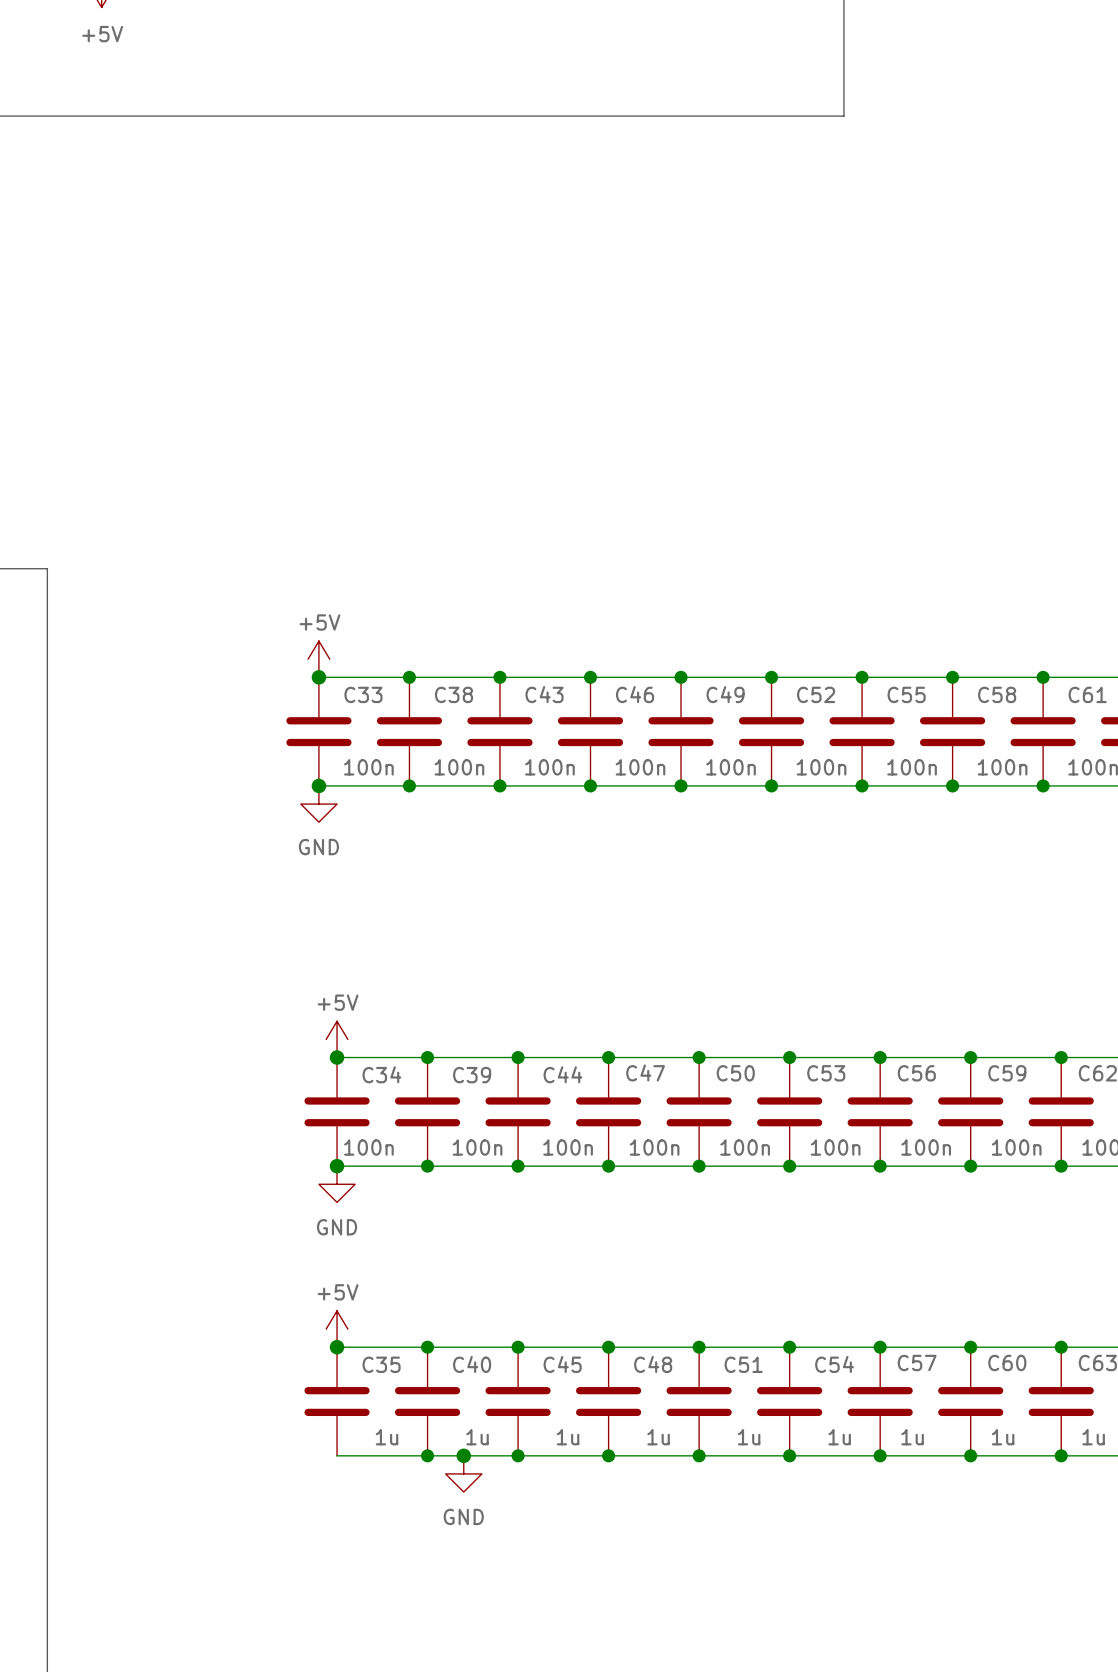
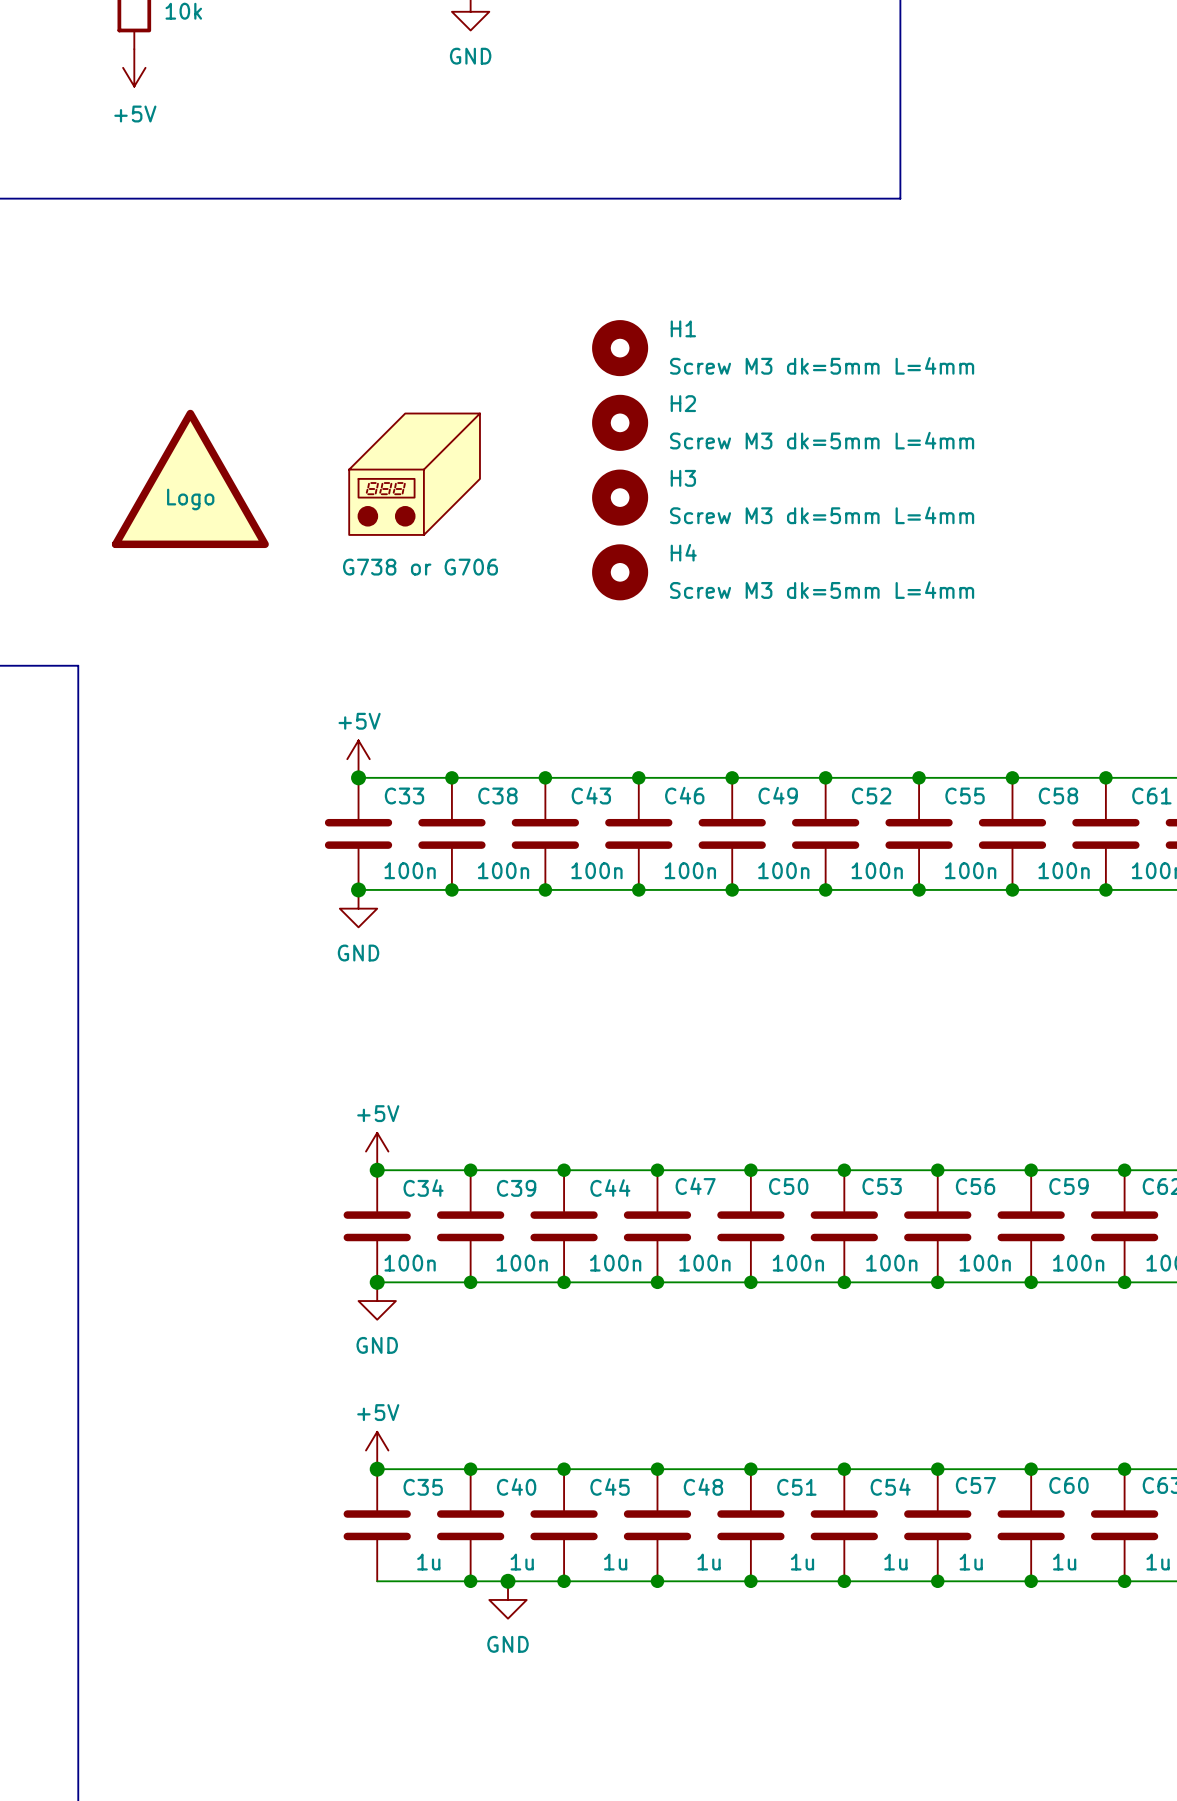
H1: none -> Screw M3 dk=5mm L=4mm (620, 348)
H2: none -> Screw M3 dk=5mm L=4mm (620, 422)
part: none -> G738 or G706 (414, 474)
part: none -> (190, 478)
H3: none -> Screw M3 dk=5mm L=4mm (620, 497)
H4: none -> Screw M3 dk=5mm L=4mm (620, 572)

